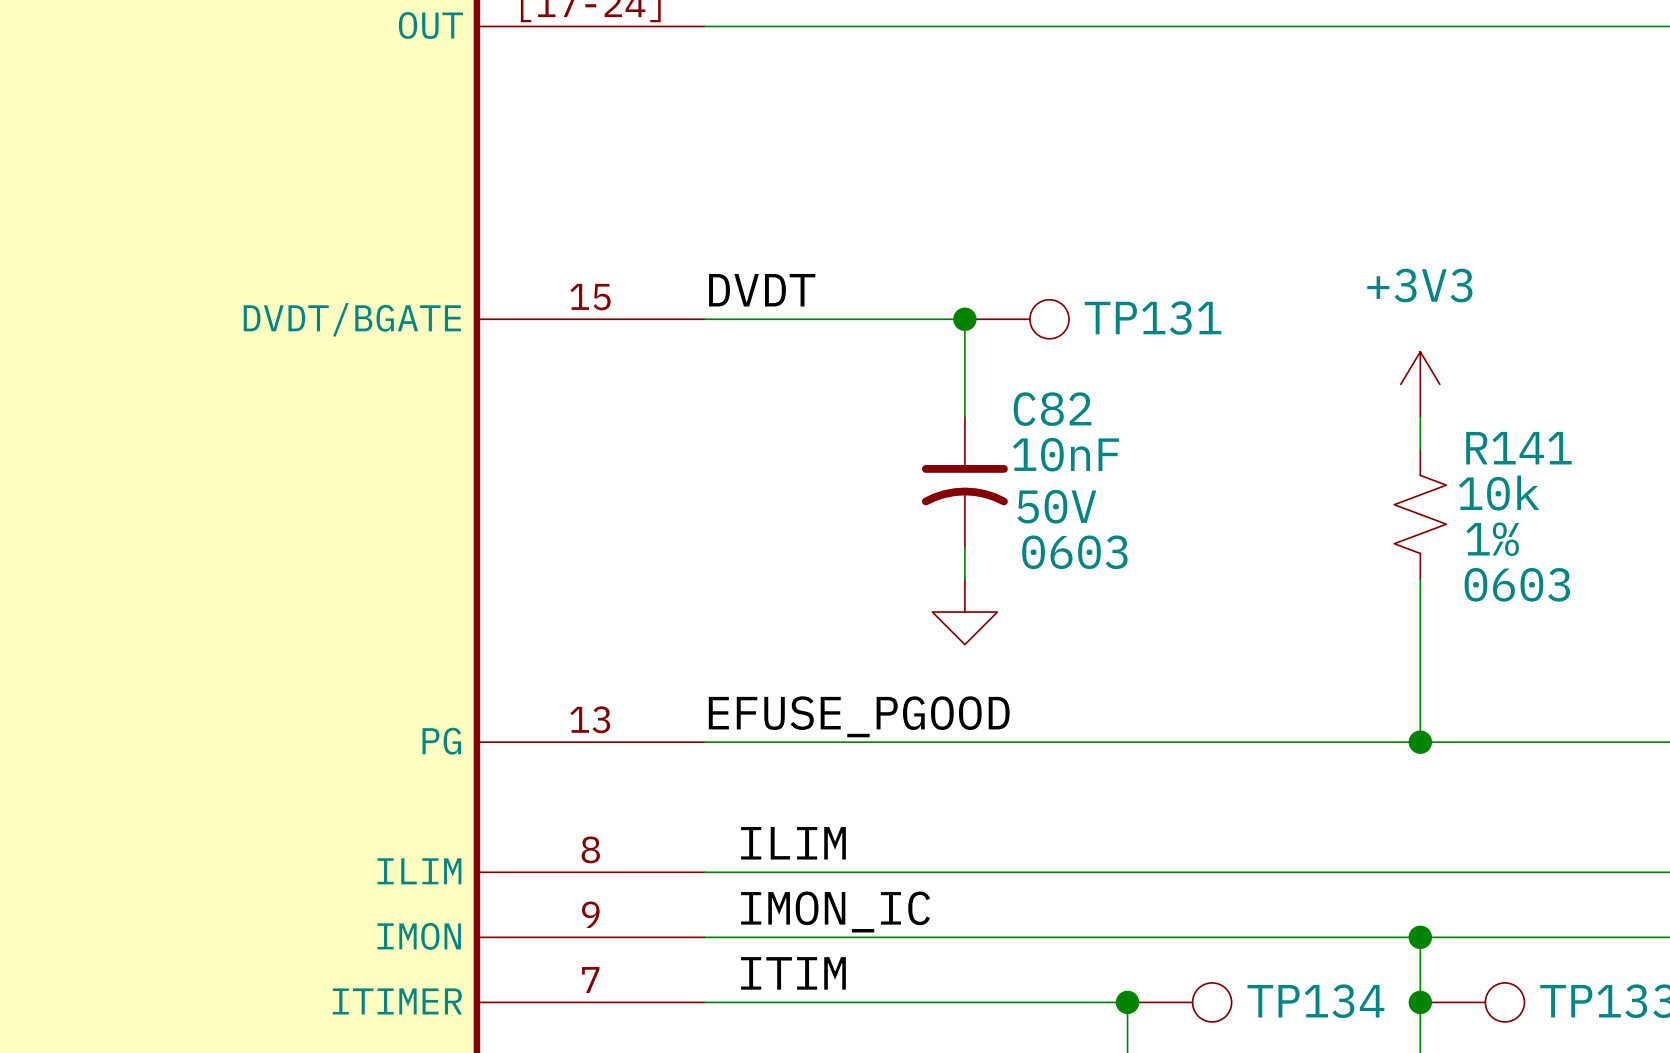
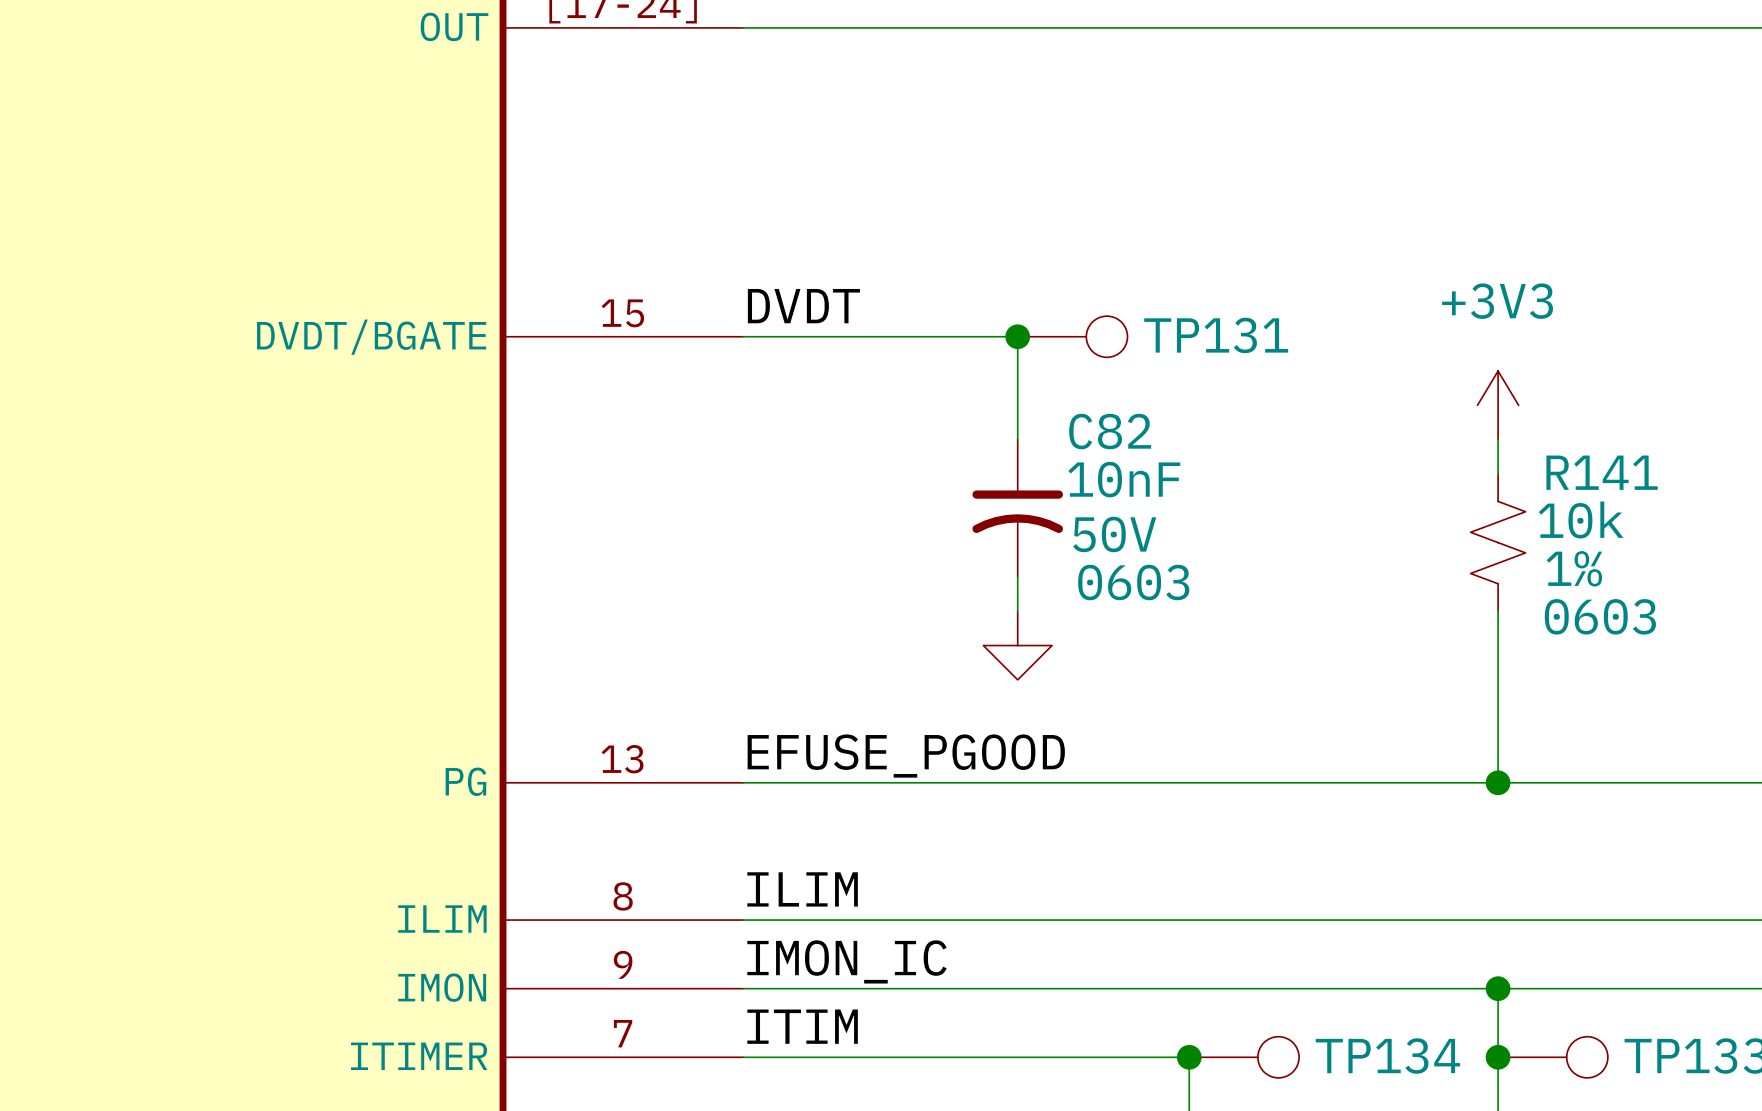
label position: ILIM (793, 843) -> ILIM (802, 889)
label position: IMON_IC (835, 911) -> IMON_IC (846, 961)
label position: ITIM (793, 973) -> ITIM (802, 1026)

